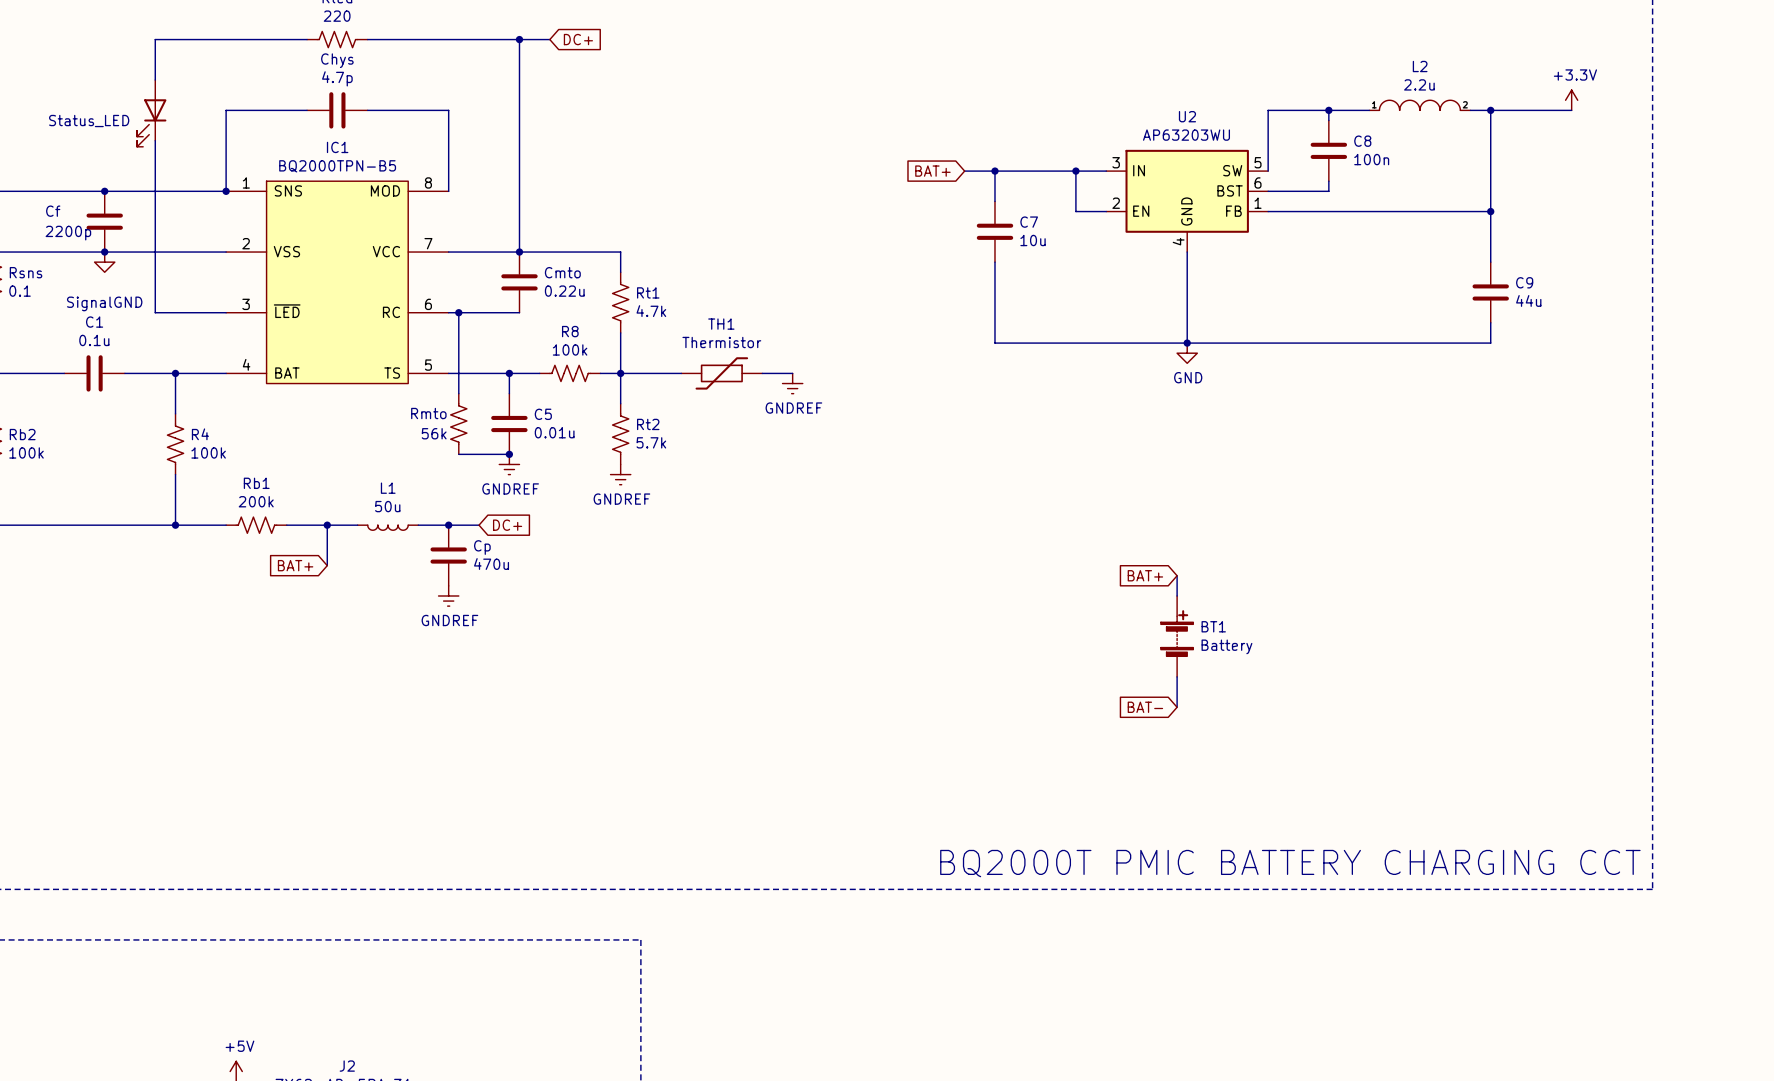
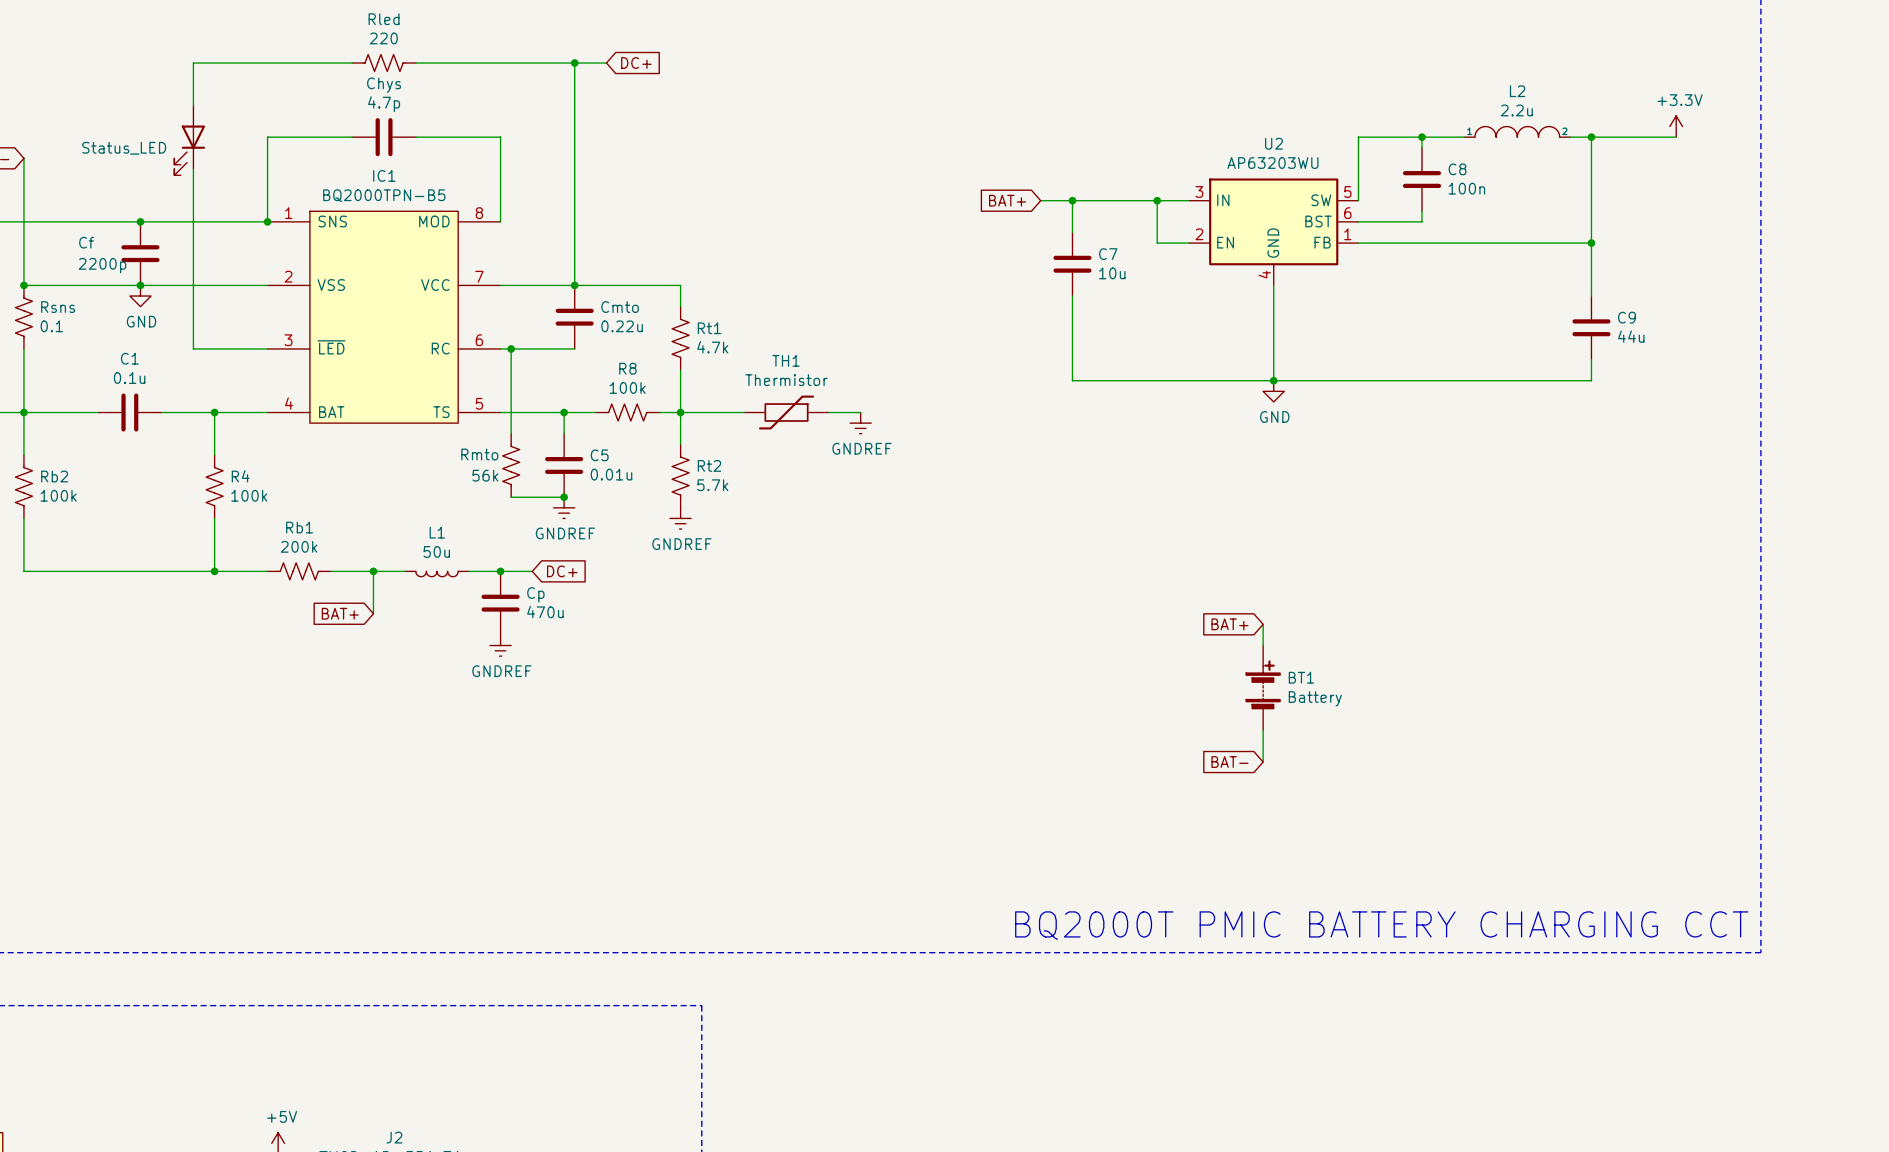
SignalGND text: none -> GND (141, 321)
SignalGND name: SignalGND (104, 303) -> none

